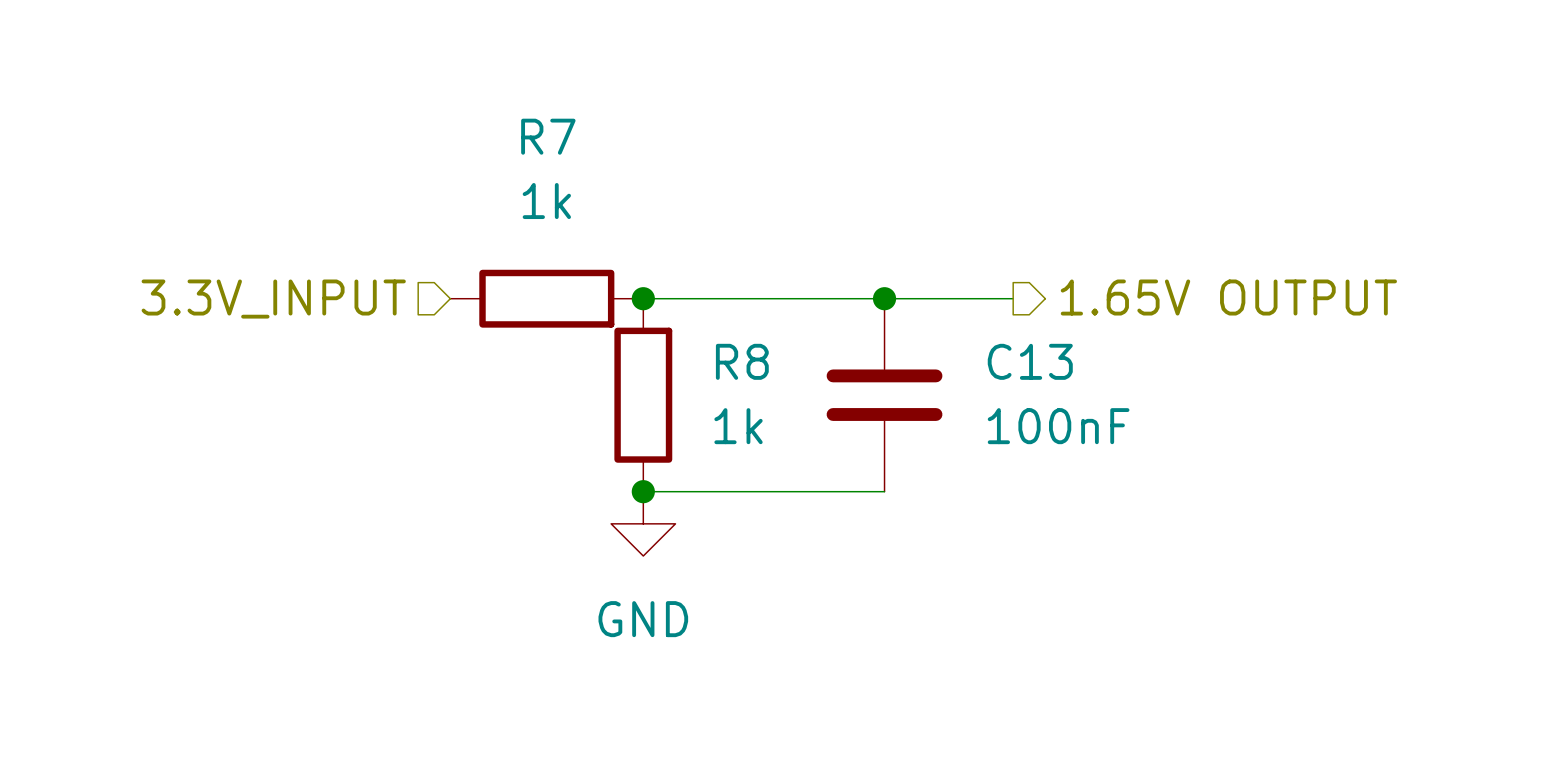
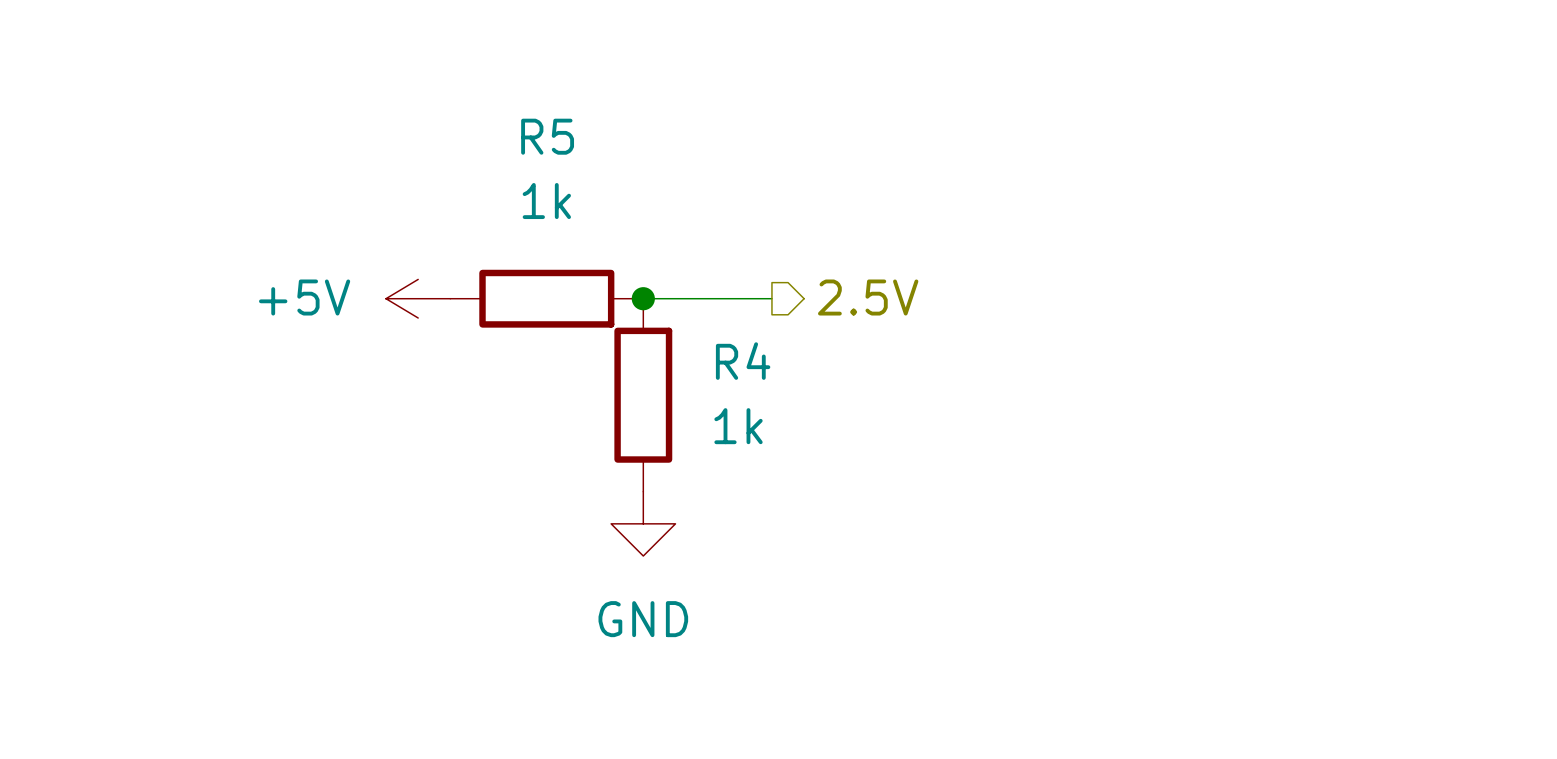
R7 name: R7 (548, 136) -> R5 (547, 136)
hierarchical label: none -> 2.5V (868, 297)
hierarchical label: 1.65V OUTPUT (1228, 297) -> none
power symbol: none -> +5V (418, 298)
wire: (771, 298) (1013, 298) -> none
junction: (884, 298) -> none
hierarchical label: 3.3V_INPUT (273, 299) -> none
R8 name: R8 (742, 361) -> R4 (743, 361)
C13: 100nF (884, 395) -> none
wire: (643, 491) (884, 491) -> none
junction: (643, 491) -> none

